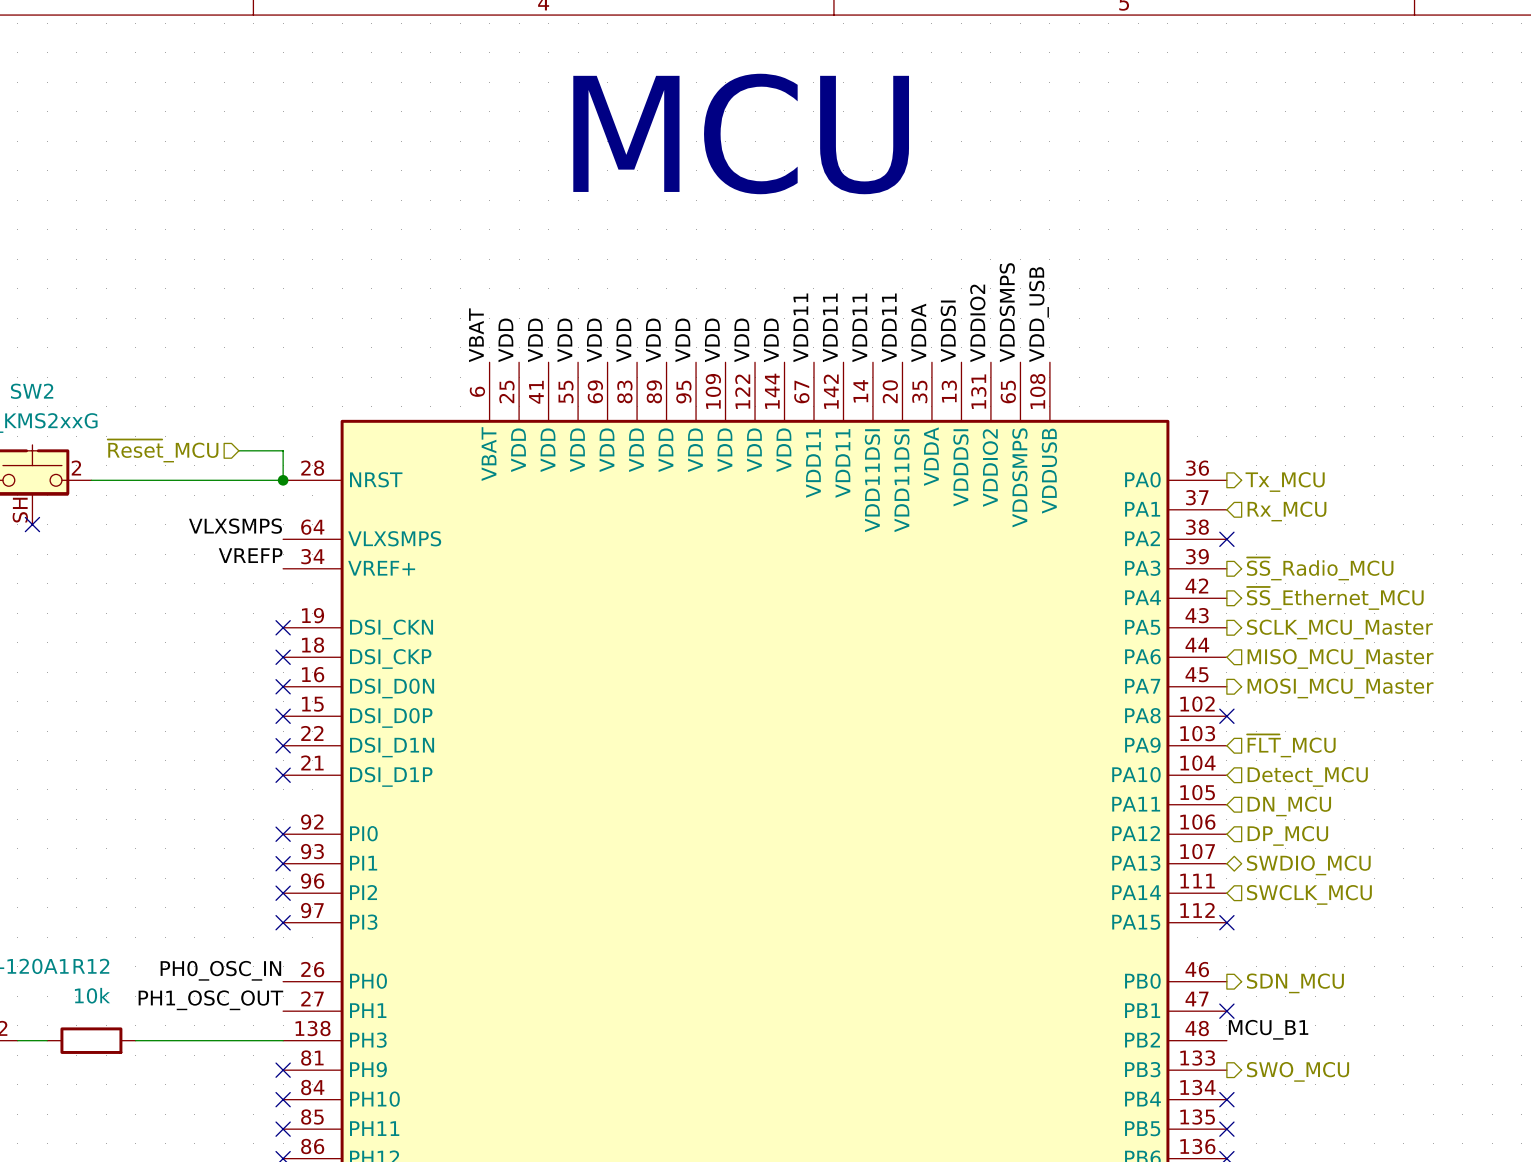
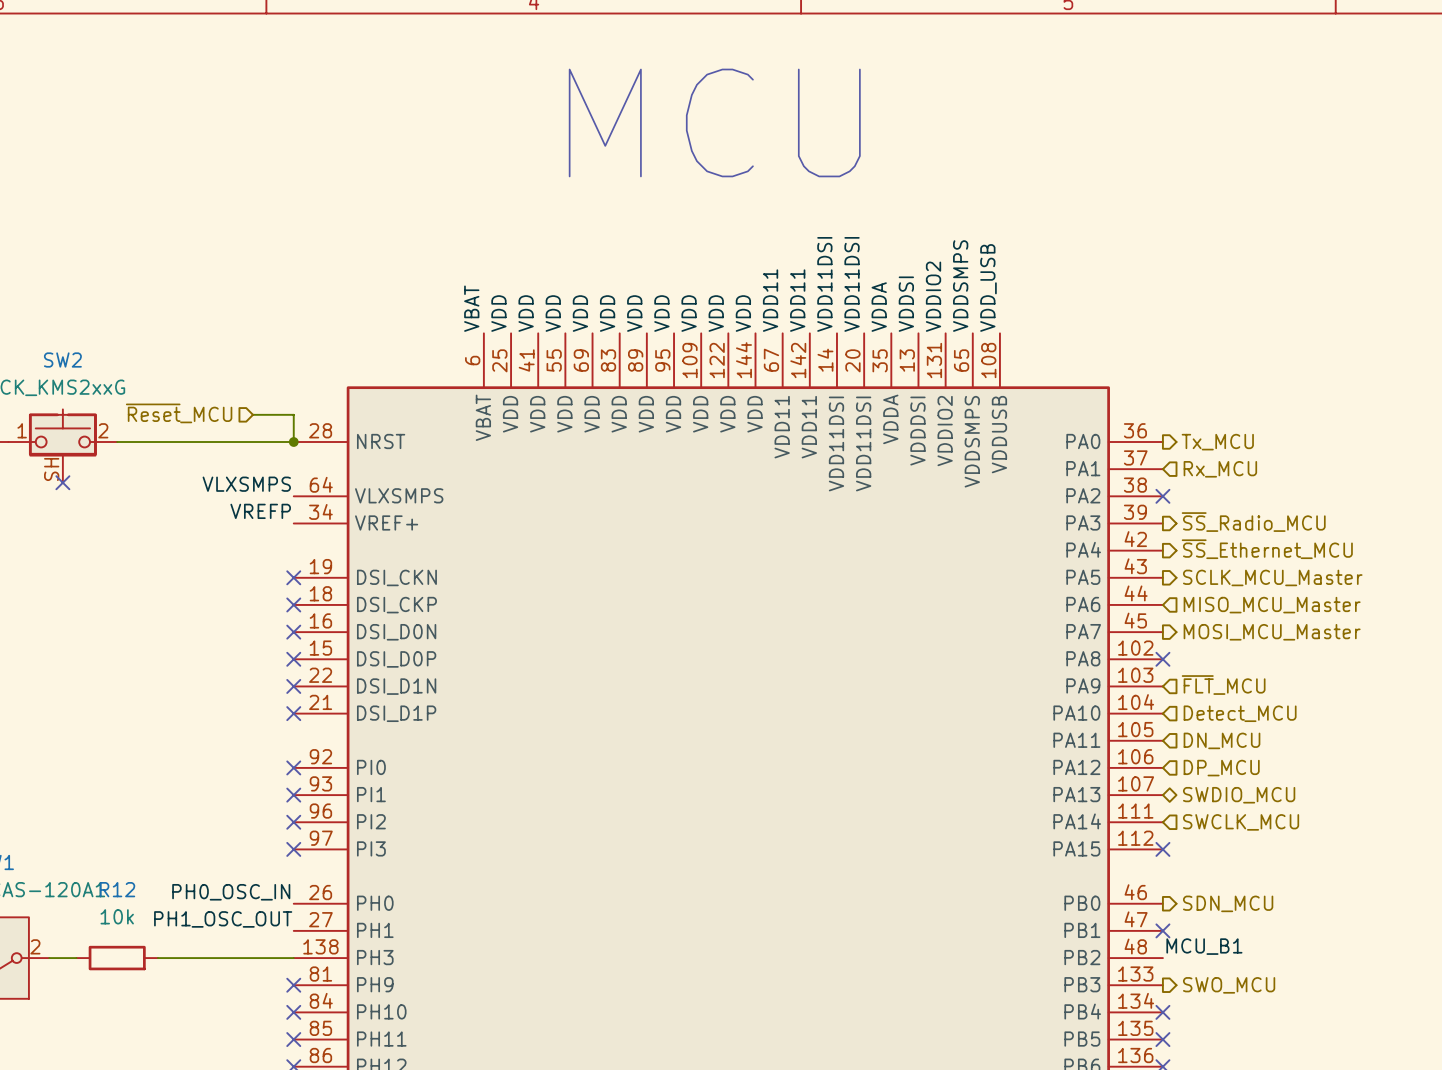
label: VDD11 (859, 327) -> VDD11DSI (824, 284)
label: VDD11 (889, 327) -> VDD11DSI (852, 284)

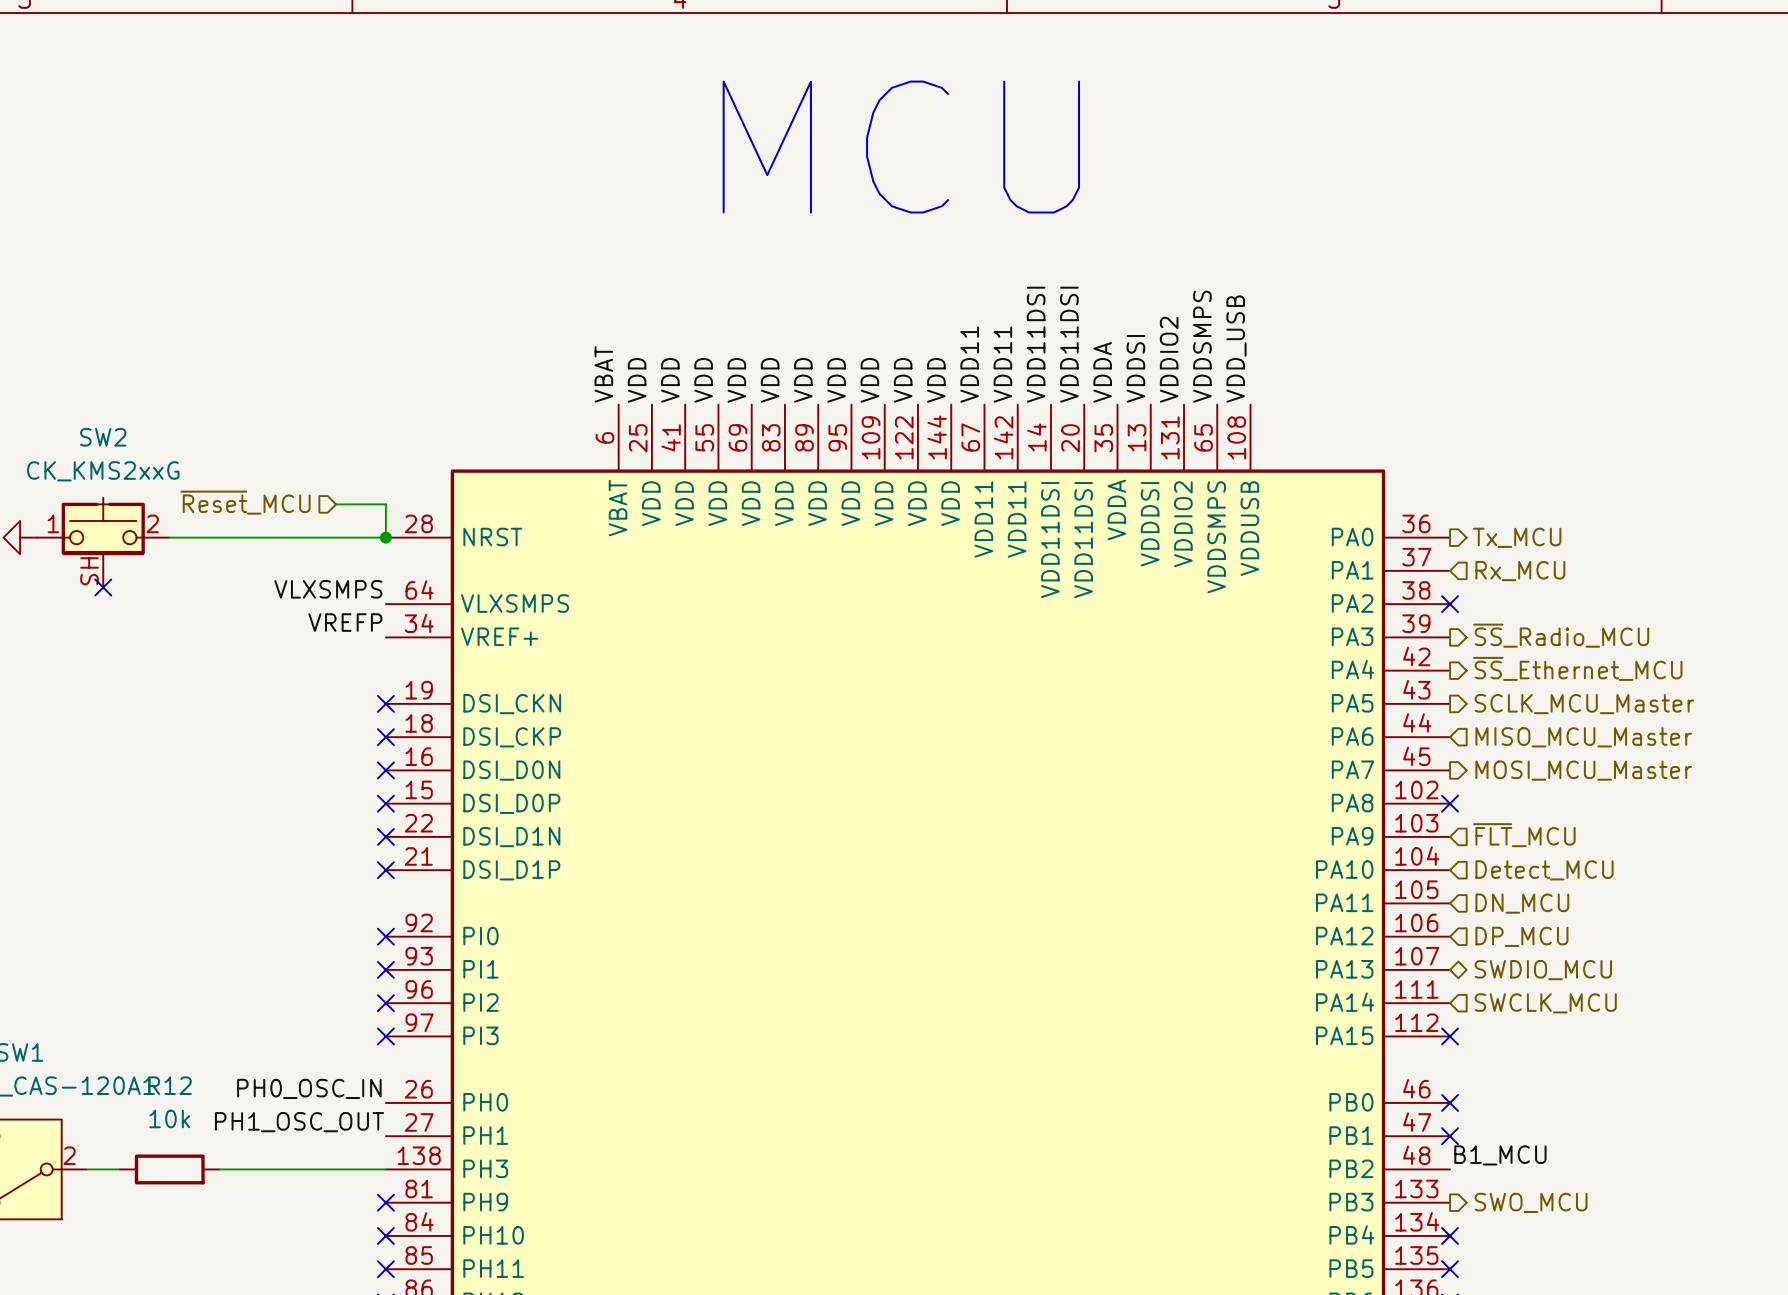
no-connect mark: none -> (1450, 1102)
hierarchical label: SDN_MCU (1228, 903) -> none
label: MCU_B1 (1204, 946) -> B1_MCU (1500, 1155)

